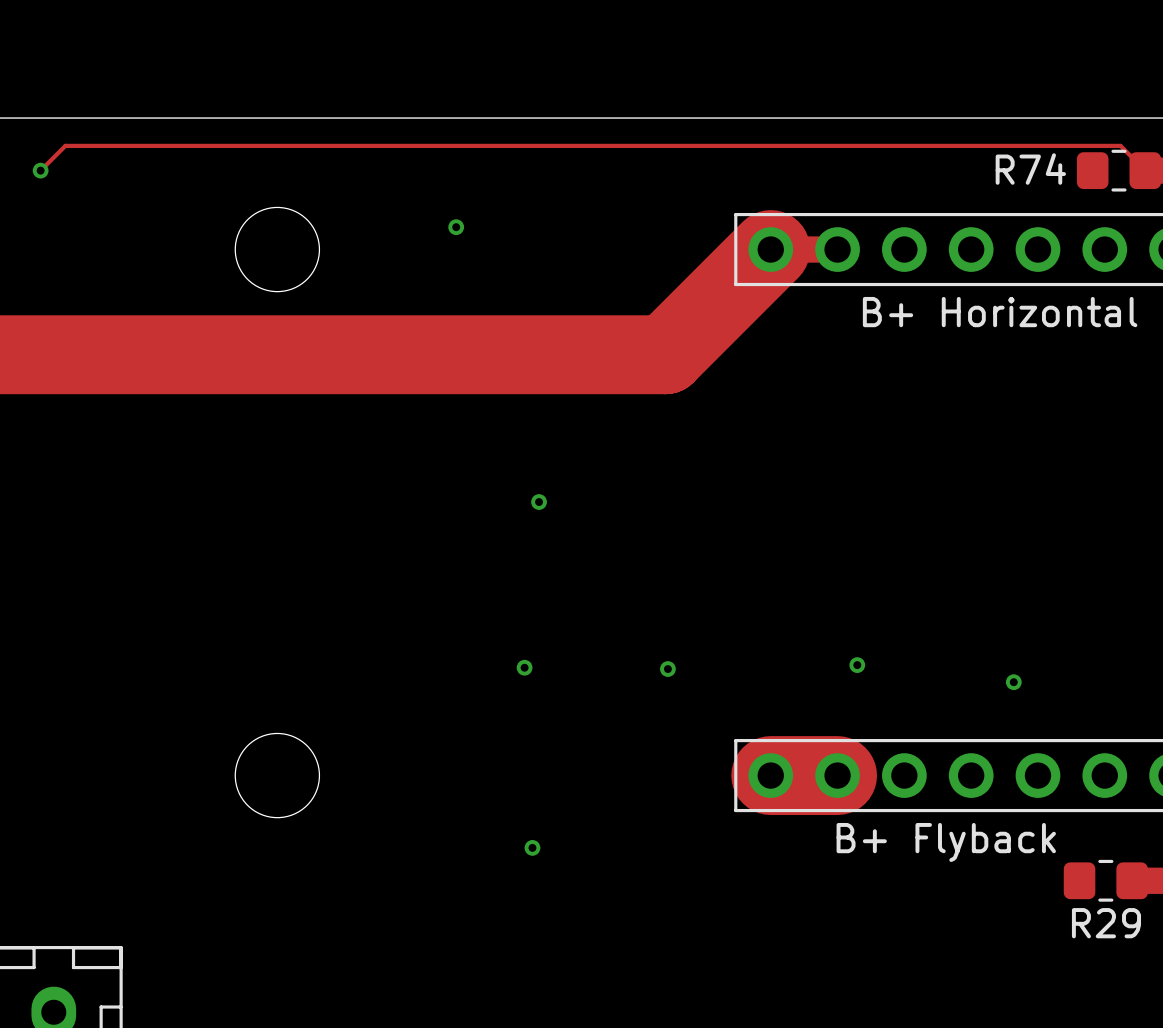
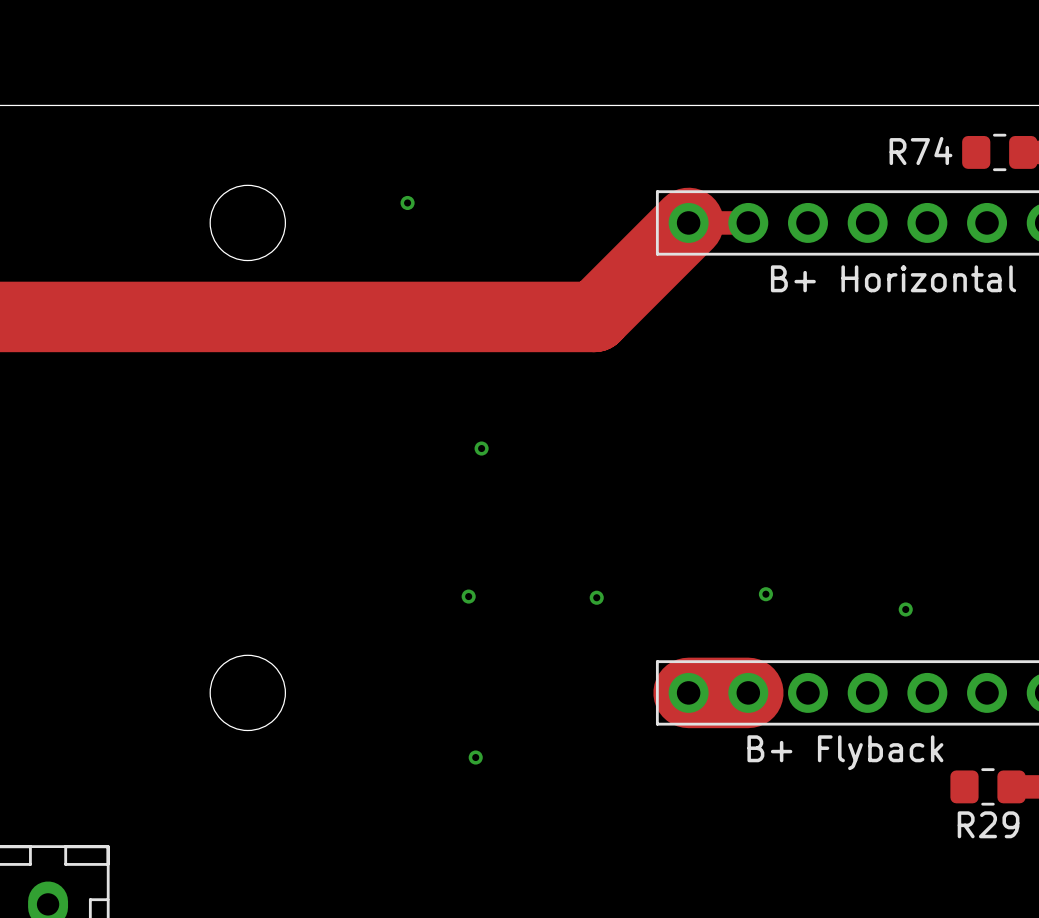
track: (40, 170) (65, 145) (1120, 145) (1145, 170) -> none
via: (40, 170) -> none

